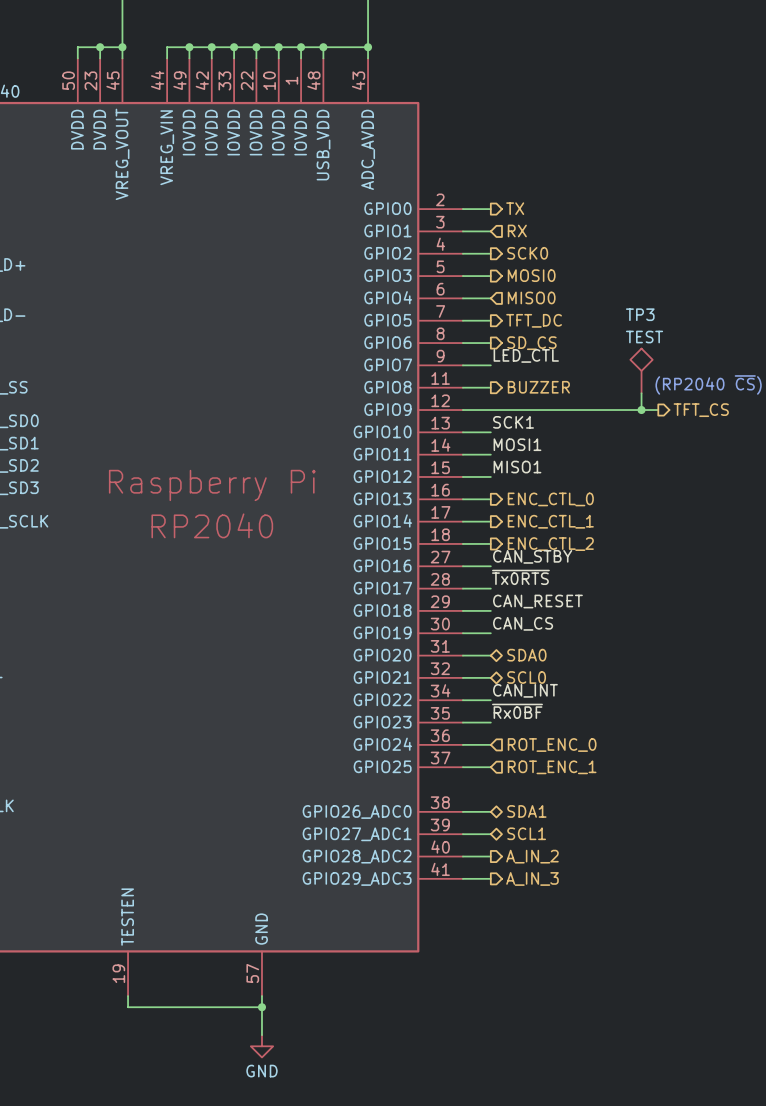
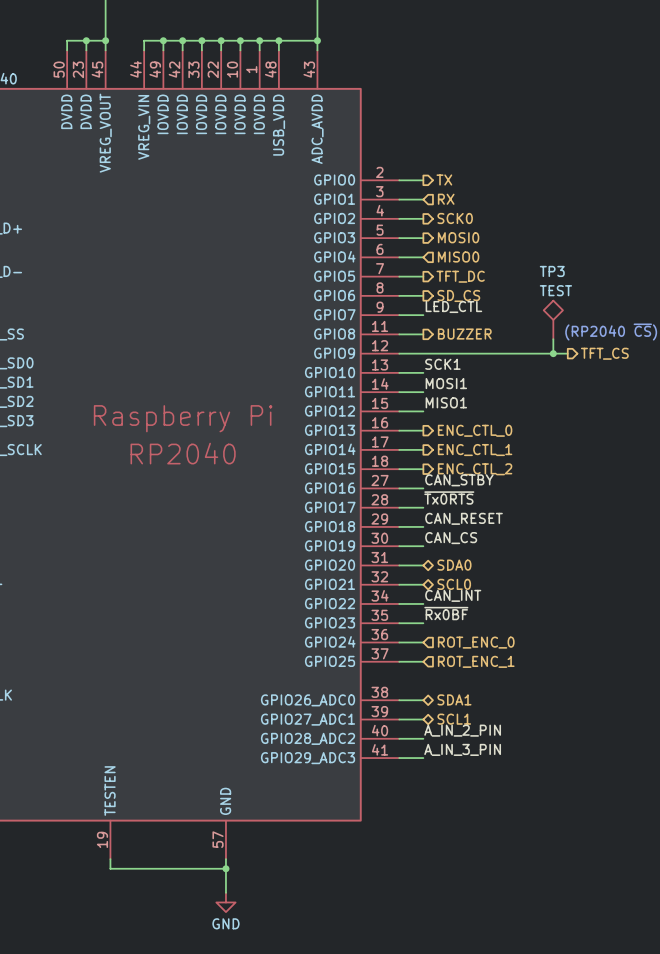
label: none -> A_IN_2_PIN (462, 730)
hierarchical label: A_IN_2 (532, 856) -> none
label: none -> A_IN_3_PIN (462, 749)
hierarchical label: A_IN_3 (532, 878) -> none

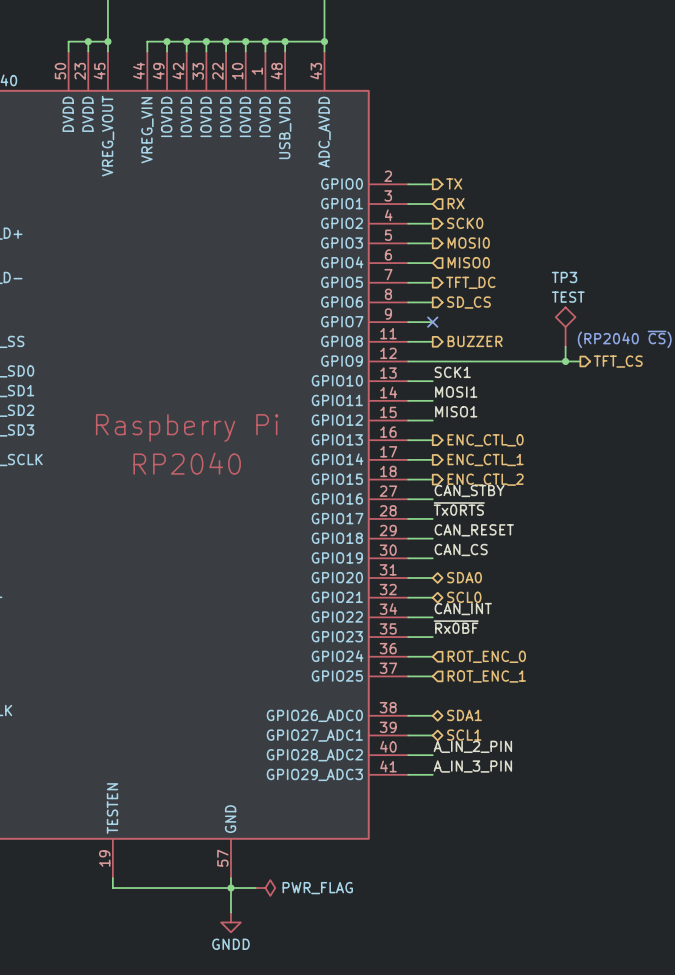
label: LED_CTL (453, 307) -> none
no-connect mark: none -> (432, 322)
wire: none -> (230, 888) (255, 888)
power symbol: none -> PWR_FLAG (265, 888)
power symbol: GND (225, 902) -> GNDD (230, 922)

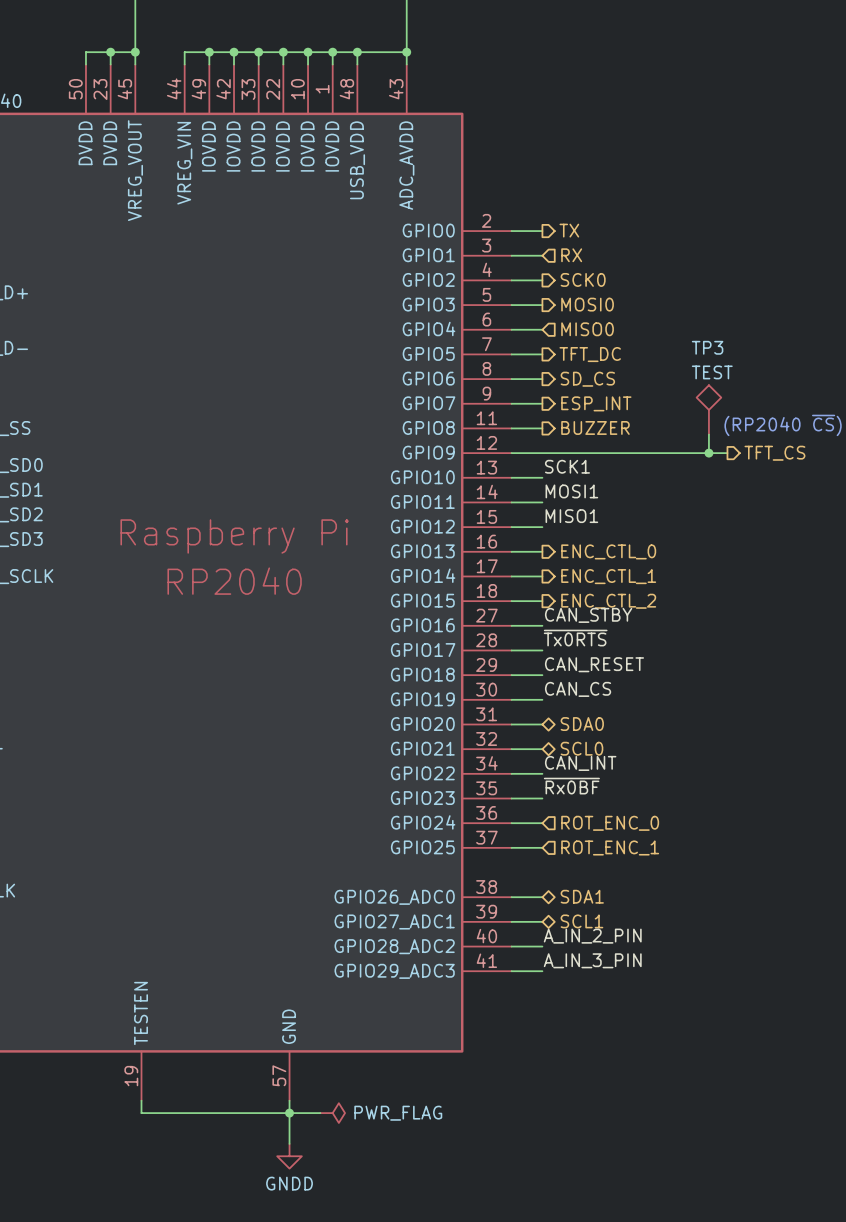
no-connect mark: (432, 322) -> none
hierarchical label: none -> ESP_INT (596, 403)

